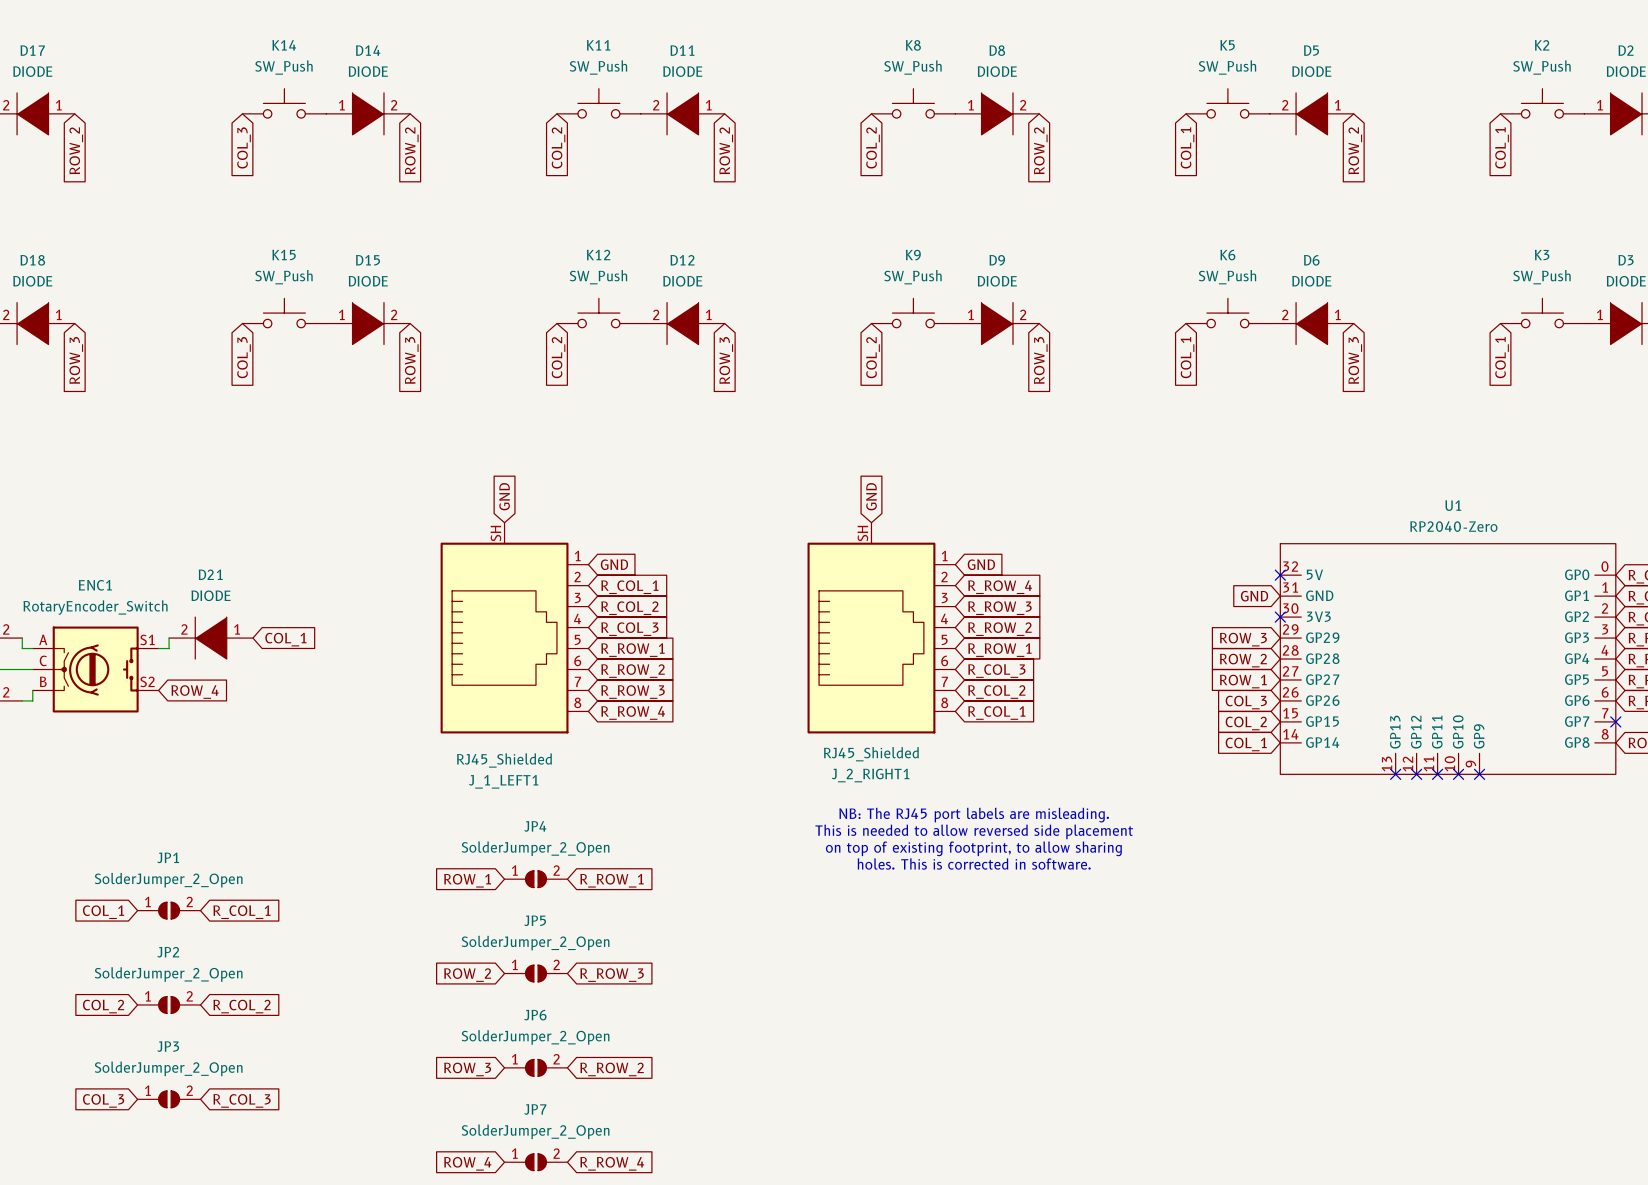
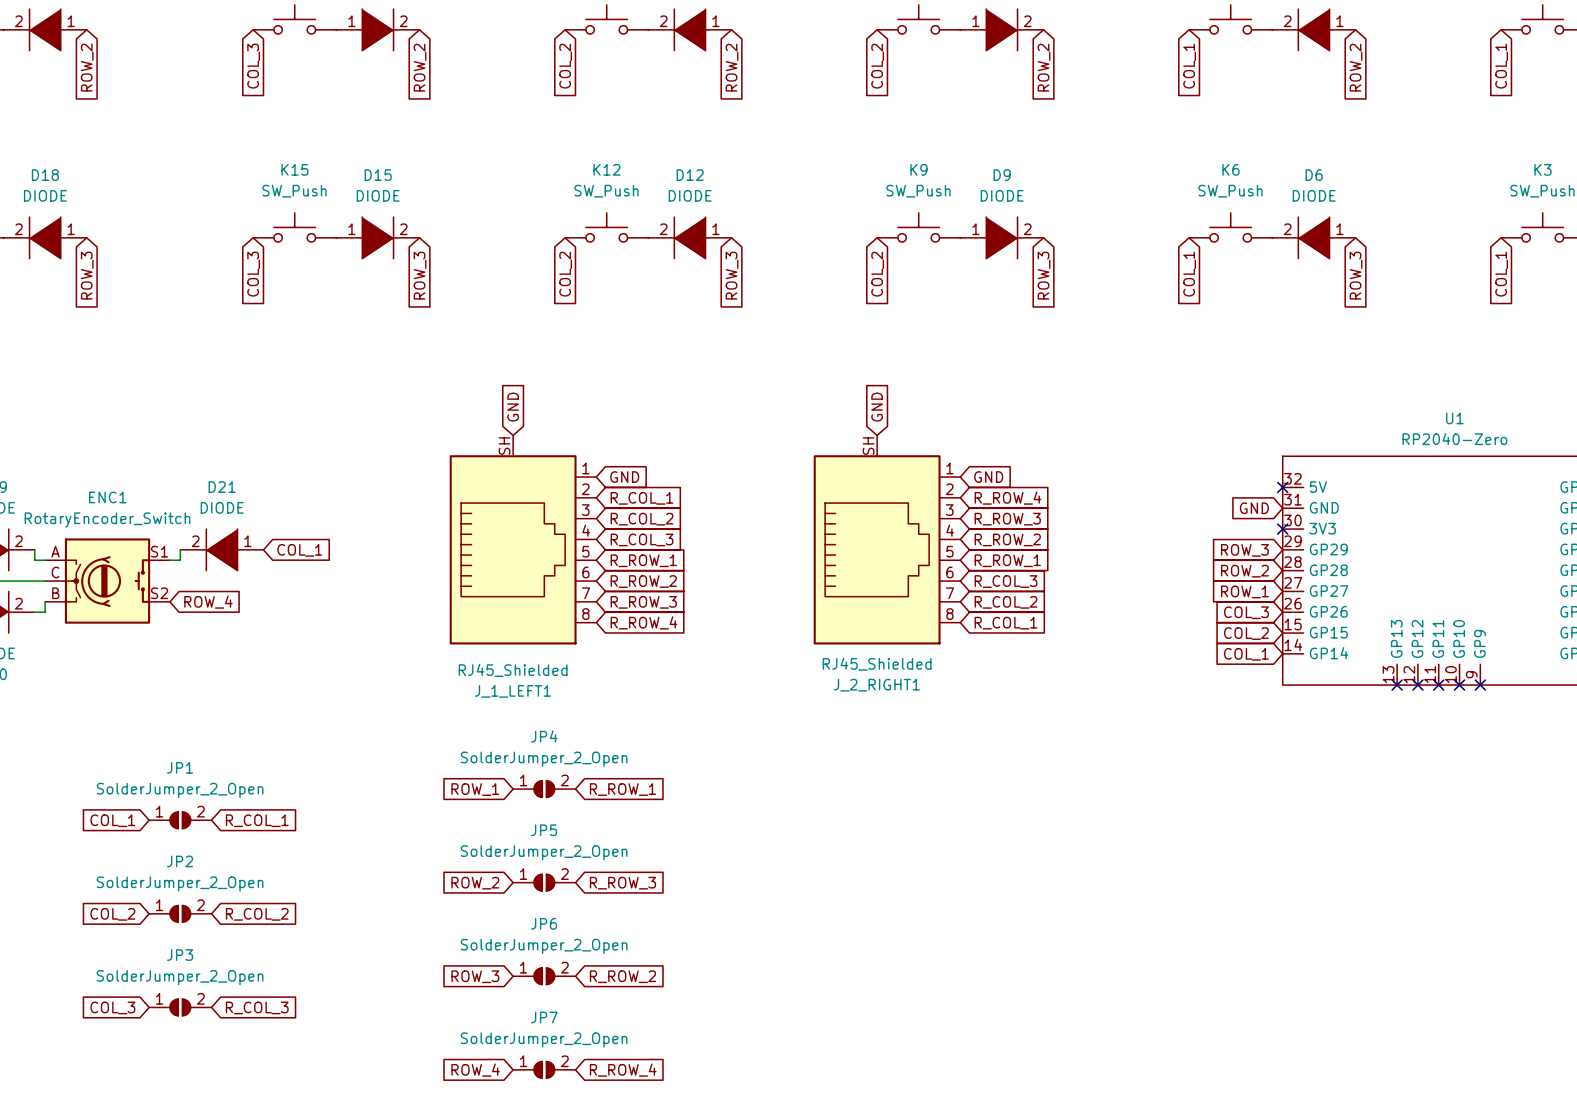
text: NB: The RJ45 port labels are misleading. (974, 815) -> none
text: This is needed to allow reversed side placement (974, 831) -> none
text: on top of existing footprint, to allow sharing (973, 848) -> none
text: holes. This is corrected in software. (974, 864) -> none

